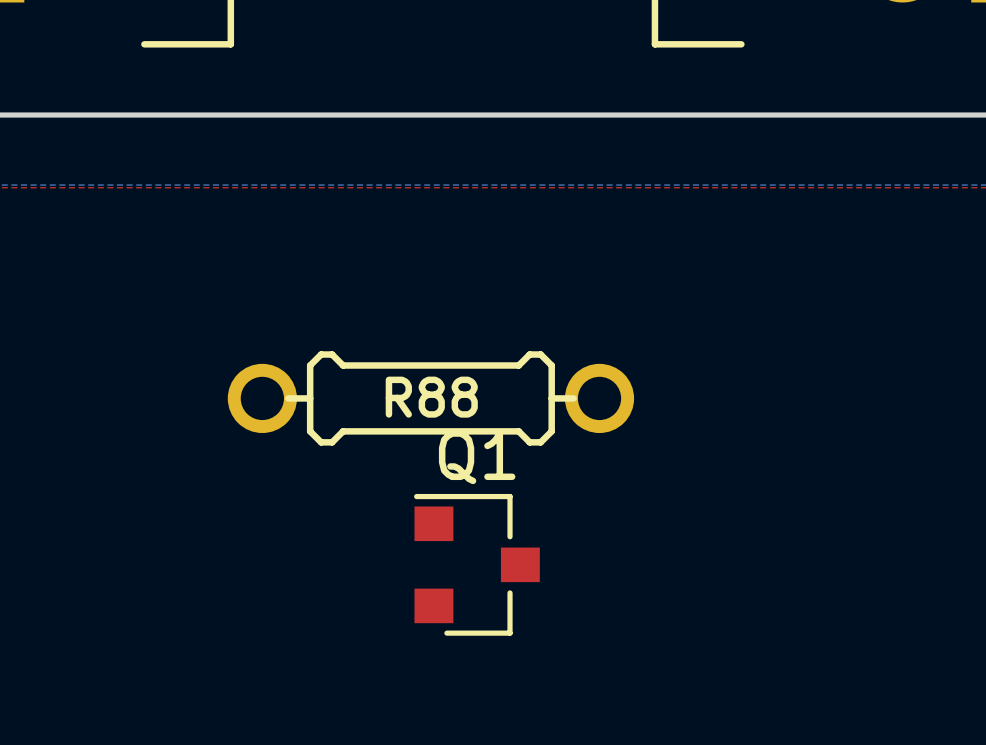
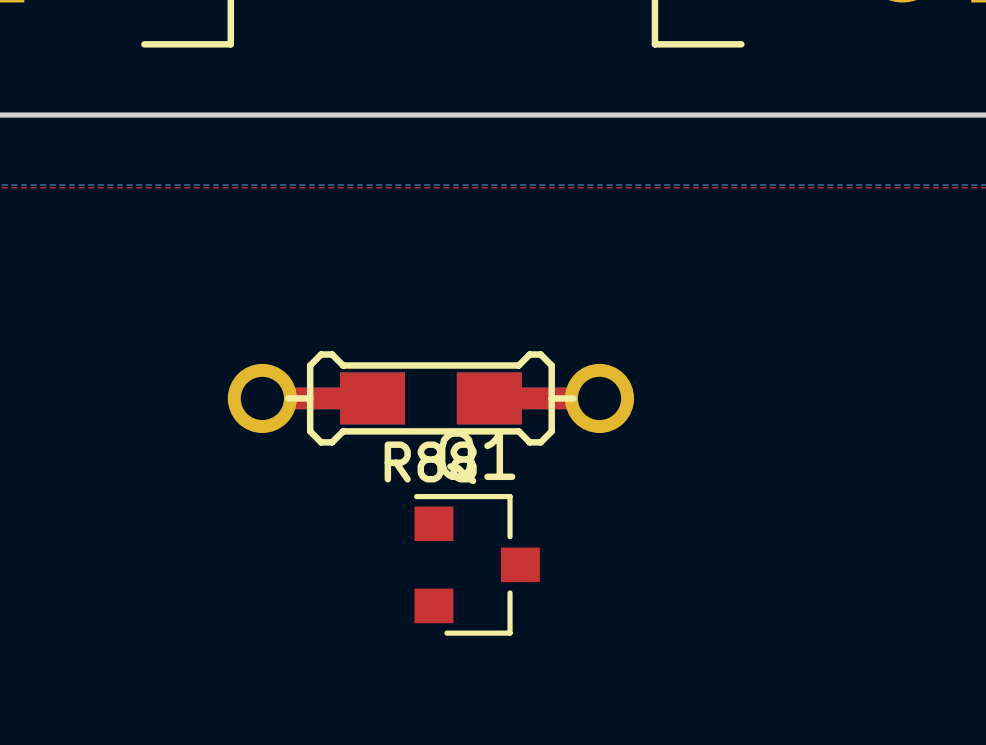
R88 footprint: [227, 351, 635, 446] -> [227, 351, 635, 446]

